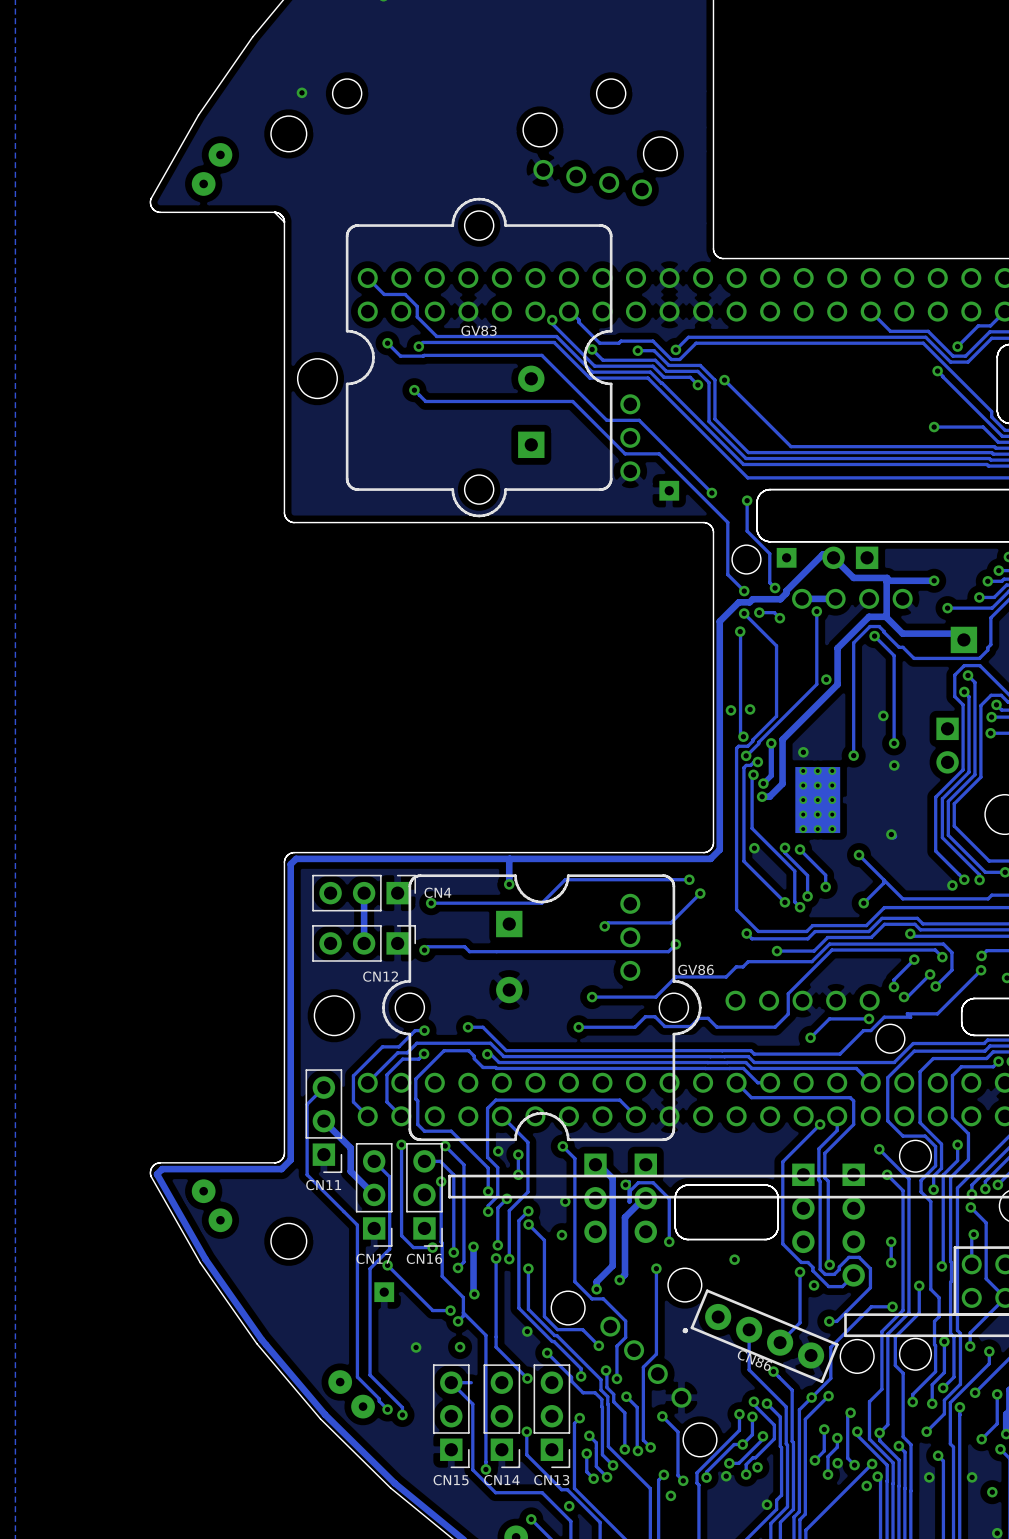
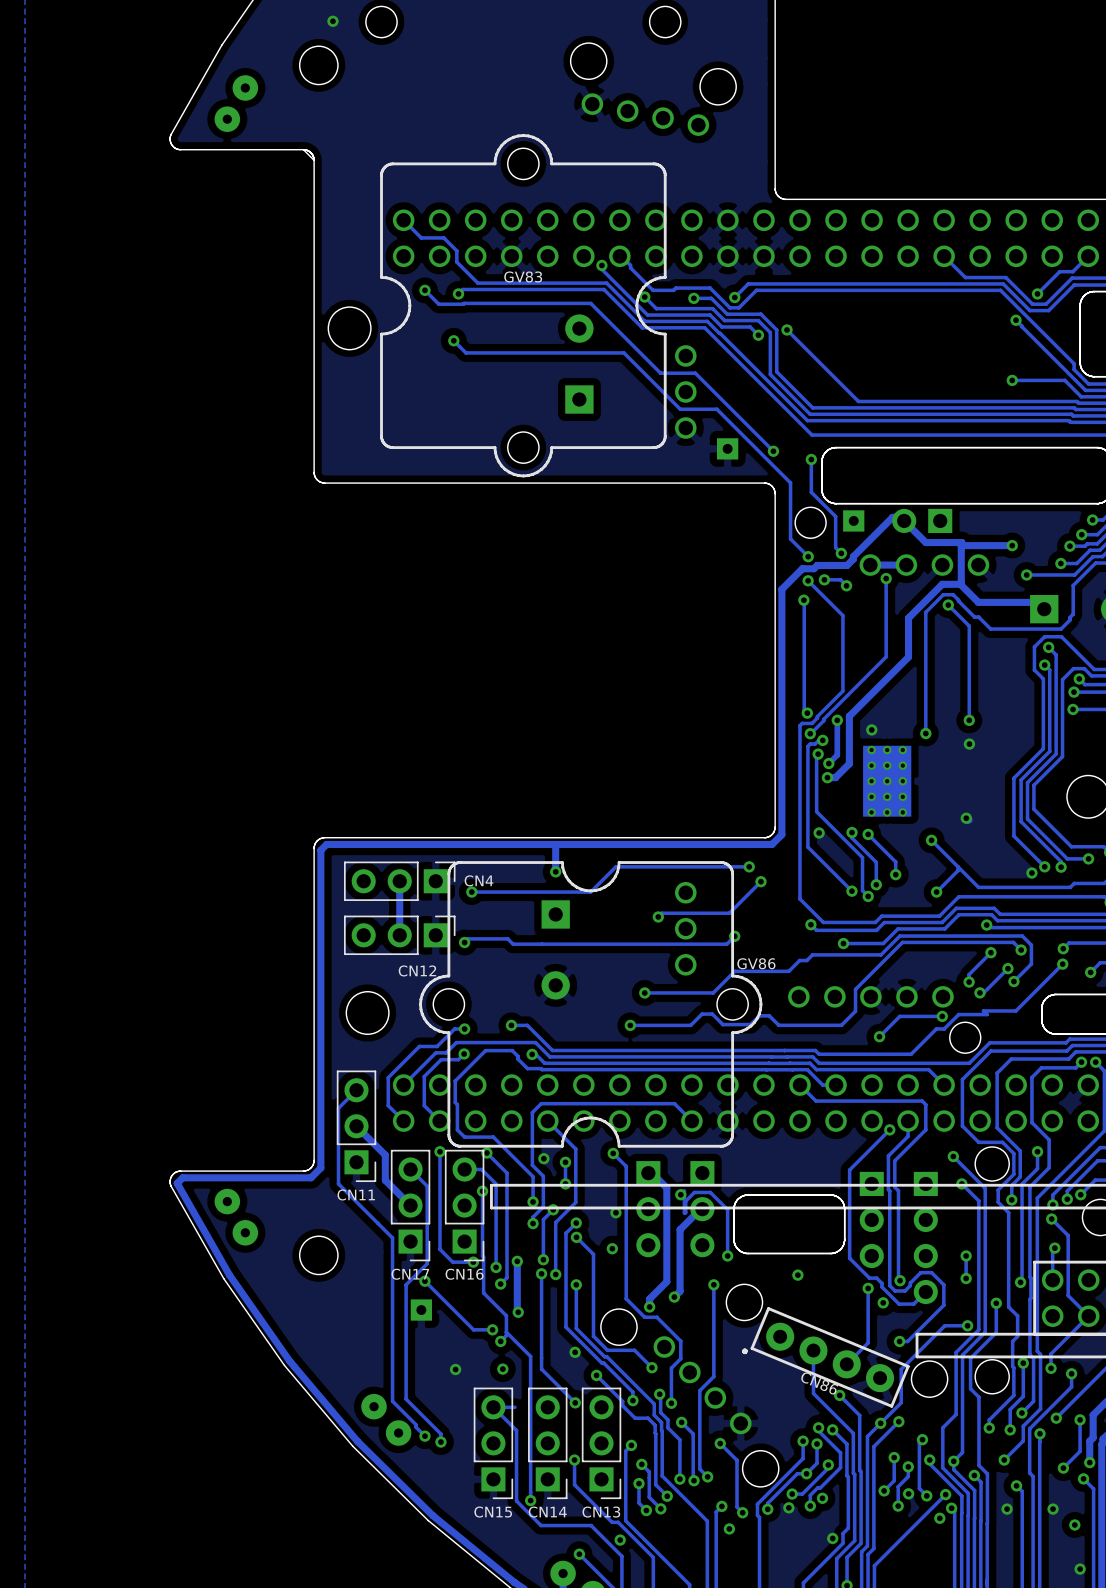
via: (826, 679) -> none
via: (750, 709) -> none
via: (730, 710) -> none
via: (883, 715) -> none
part: (947, 745) -> none

